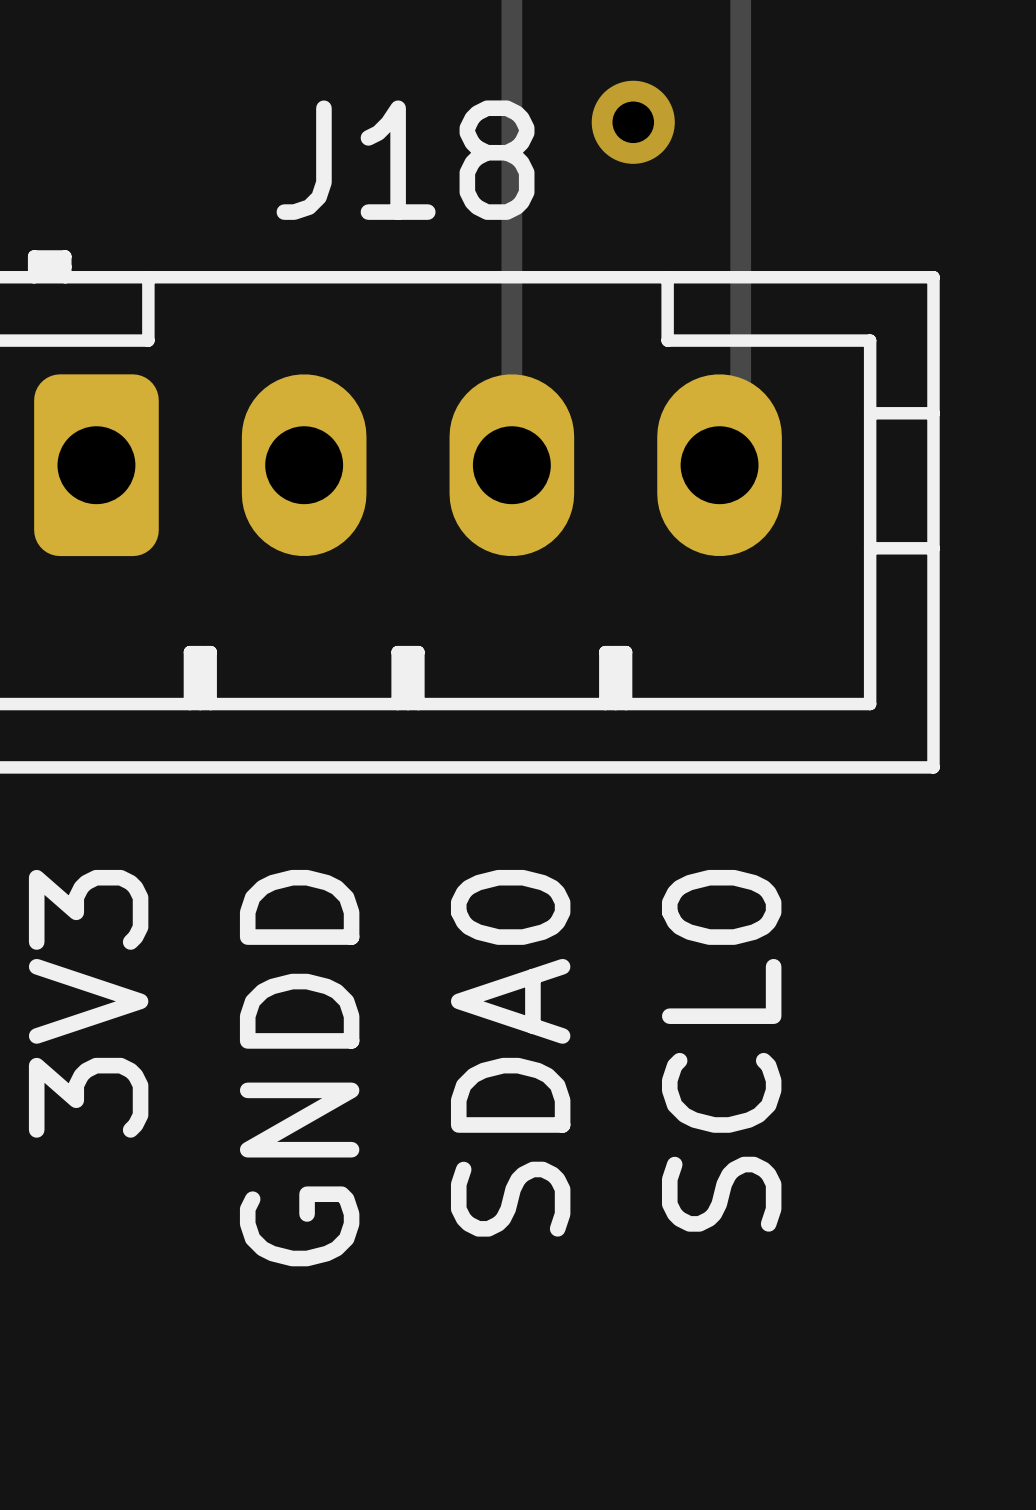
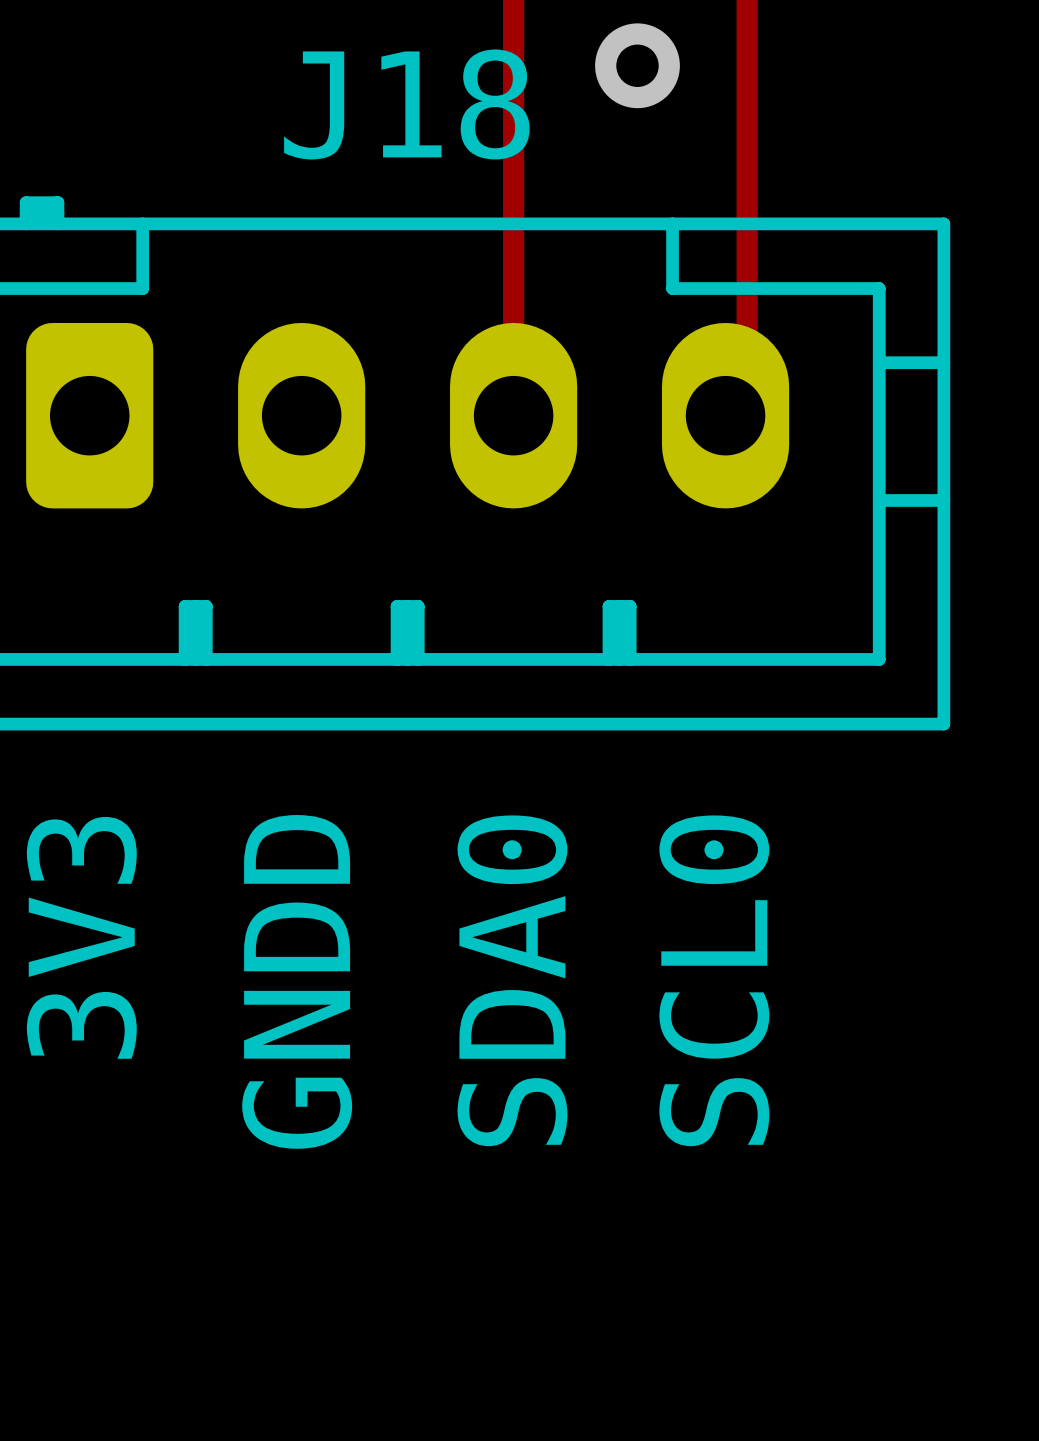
text position: SCL0 (721, 1050) -> SCL0 (714, 980)

